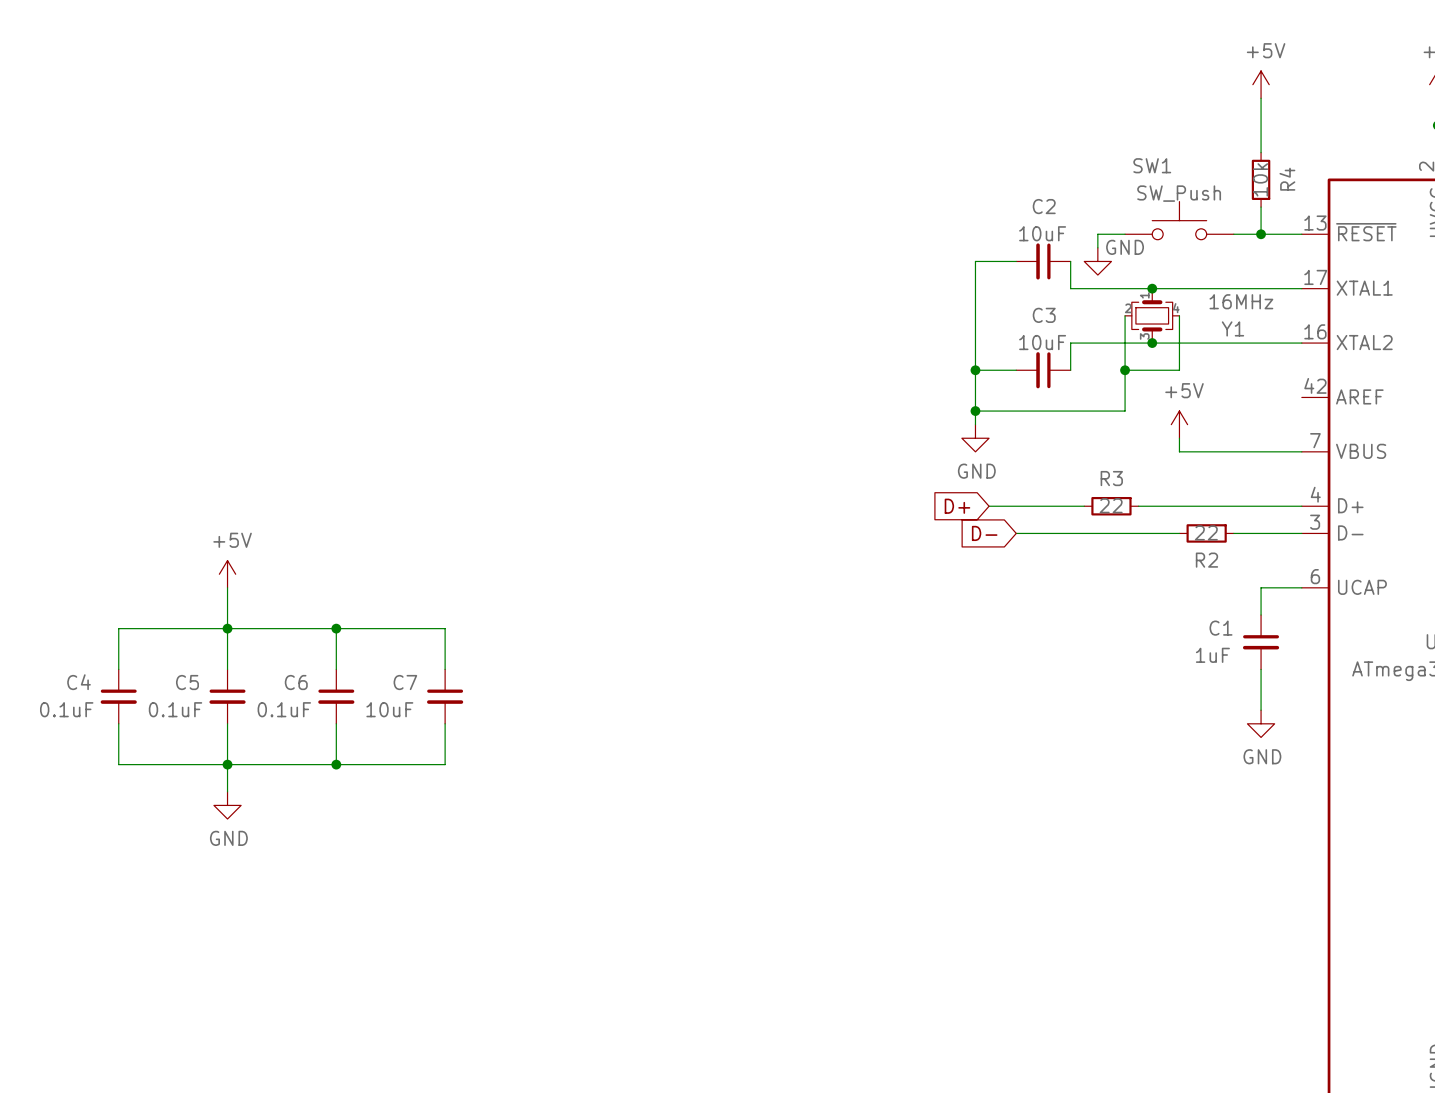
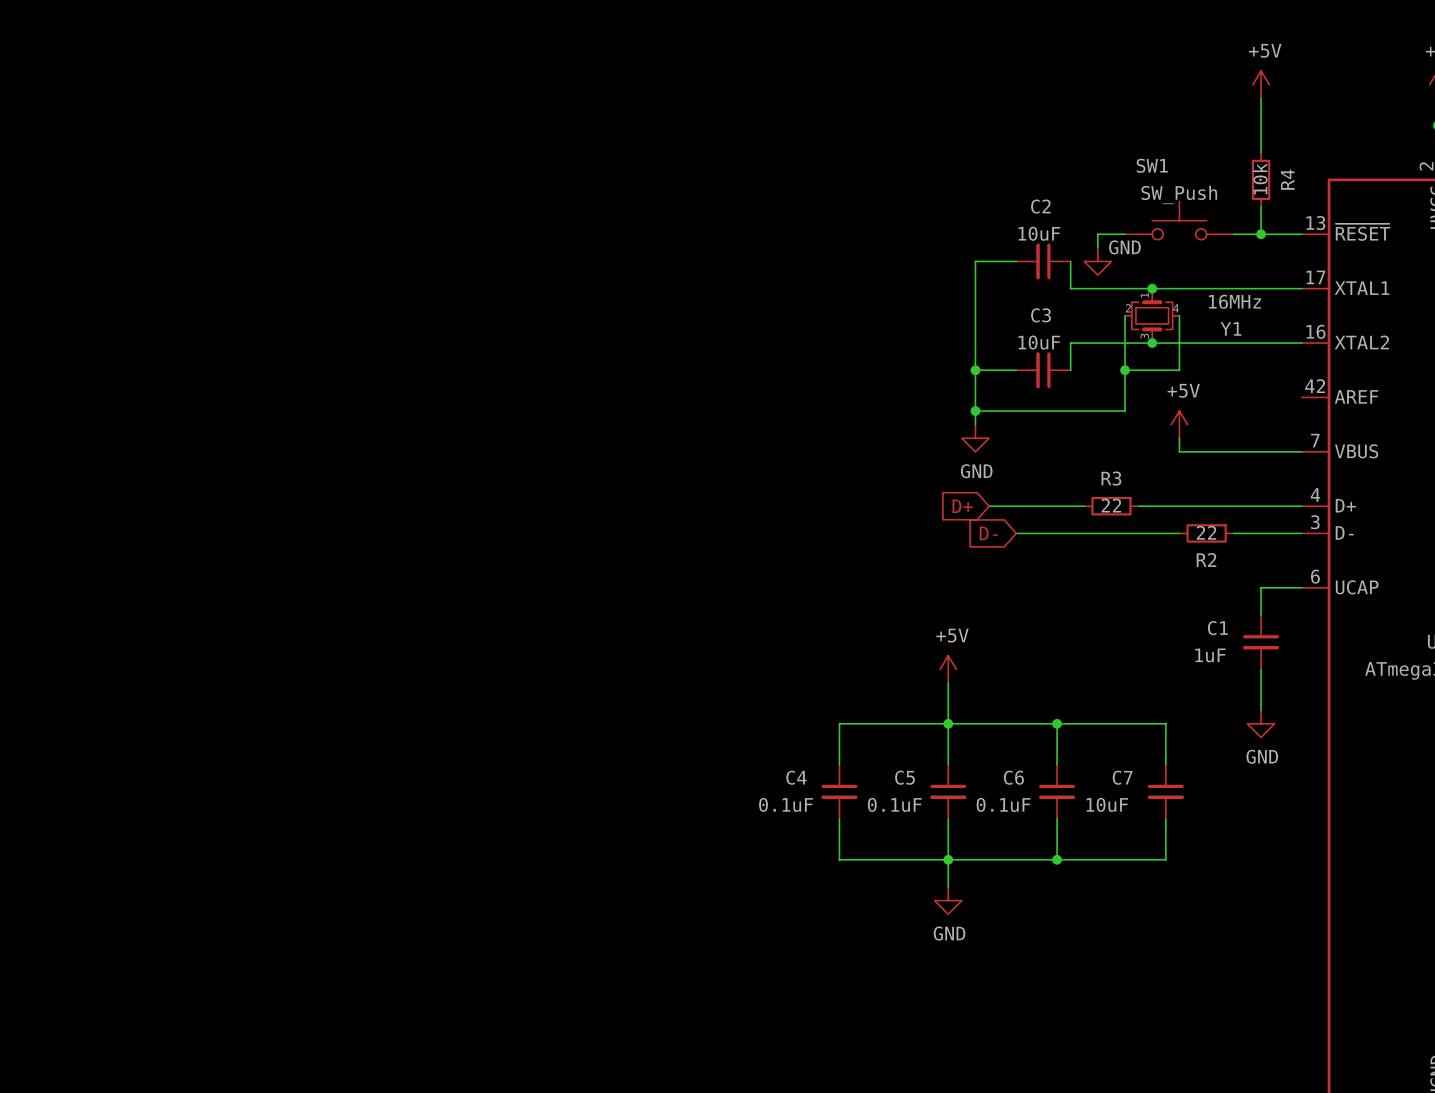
power symbol: +5V (227, 574) -> none
wire: (227, 587) (227, 669) -> none
junction: (227, 628) -> none
wire: (336, 628) (336, 669) -> none
junction: (336, 628) -> none
wire: (118, 669) (118, 628) (445, 628) (445, 669) -> none
power symbol: none -> +5V (948, 669)
wire: none -> (948, 683) (948, 764)
C4 position: (118, 696) -> (839, 791)
C5 position: (227, 696) -> (948, 791)
C6 position: (336, 696) -> (1057, 791)
C7 position: (445, 696) -> (1165, 791)
wire: (118, 723) (118, 764) (445, 764) (445, 723) -> none
wire: (227, 723) (227, 791) -> none
wire: (336, 723) (336, 764) -> none
junction: none -> (948, 723)
wire: none -> (1057, 723) (1057, 764)
junction: none -> (1057, 723)
junction: (227, 764) -> none
junction: (336, 764) -> none
wire: none -> (839, 764) (839, 723) (1165, 723) (1165, 764)
power symbol: GND (227, 805) -> none
wire: none -> (839, 819) (839, 859) (1165, 859) (1165, 819)
wire: none -> (948, 819) (948, 887)
wire: none -> (1057, 819) (1057, 859)
junction: none -> (948, 859)
junction: none -> (1057, 859)
power symbol: none -> GND (948, 900)

